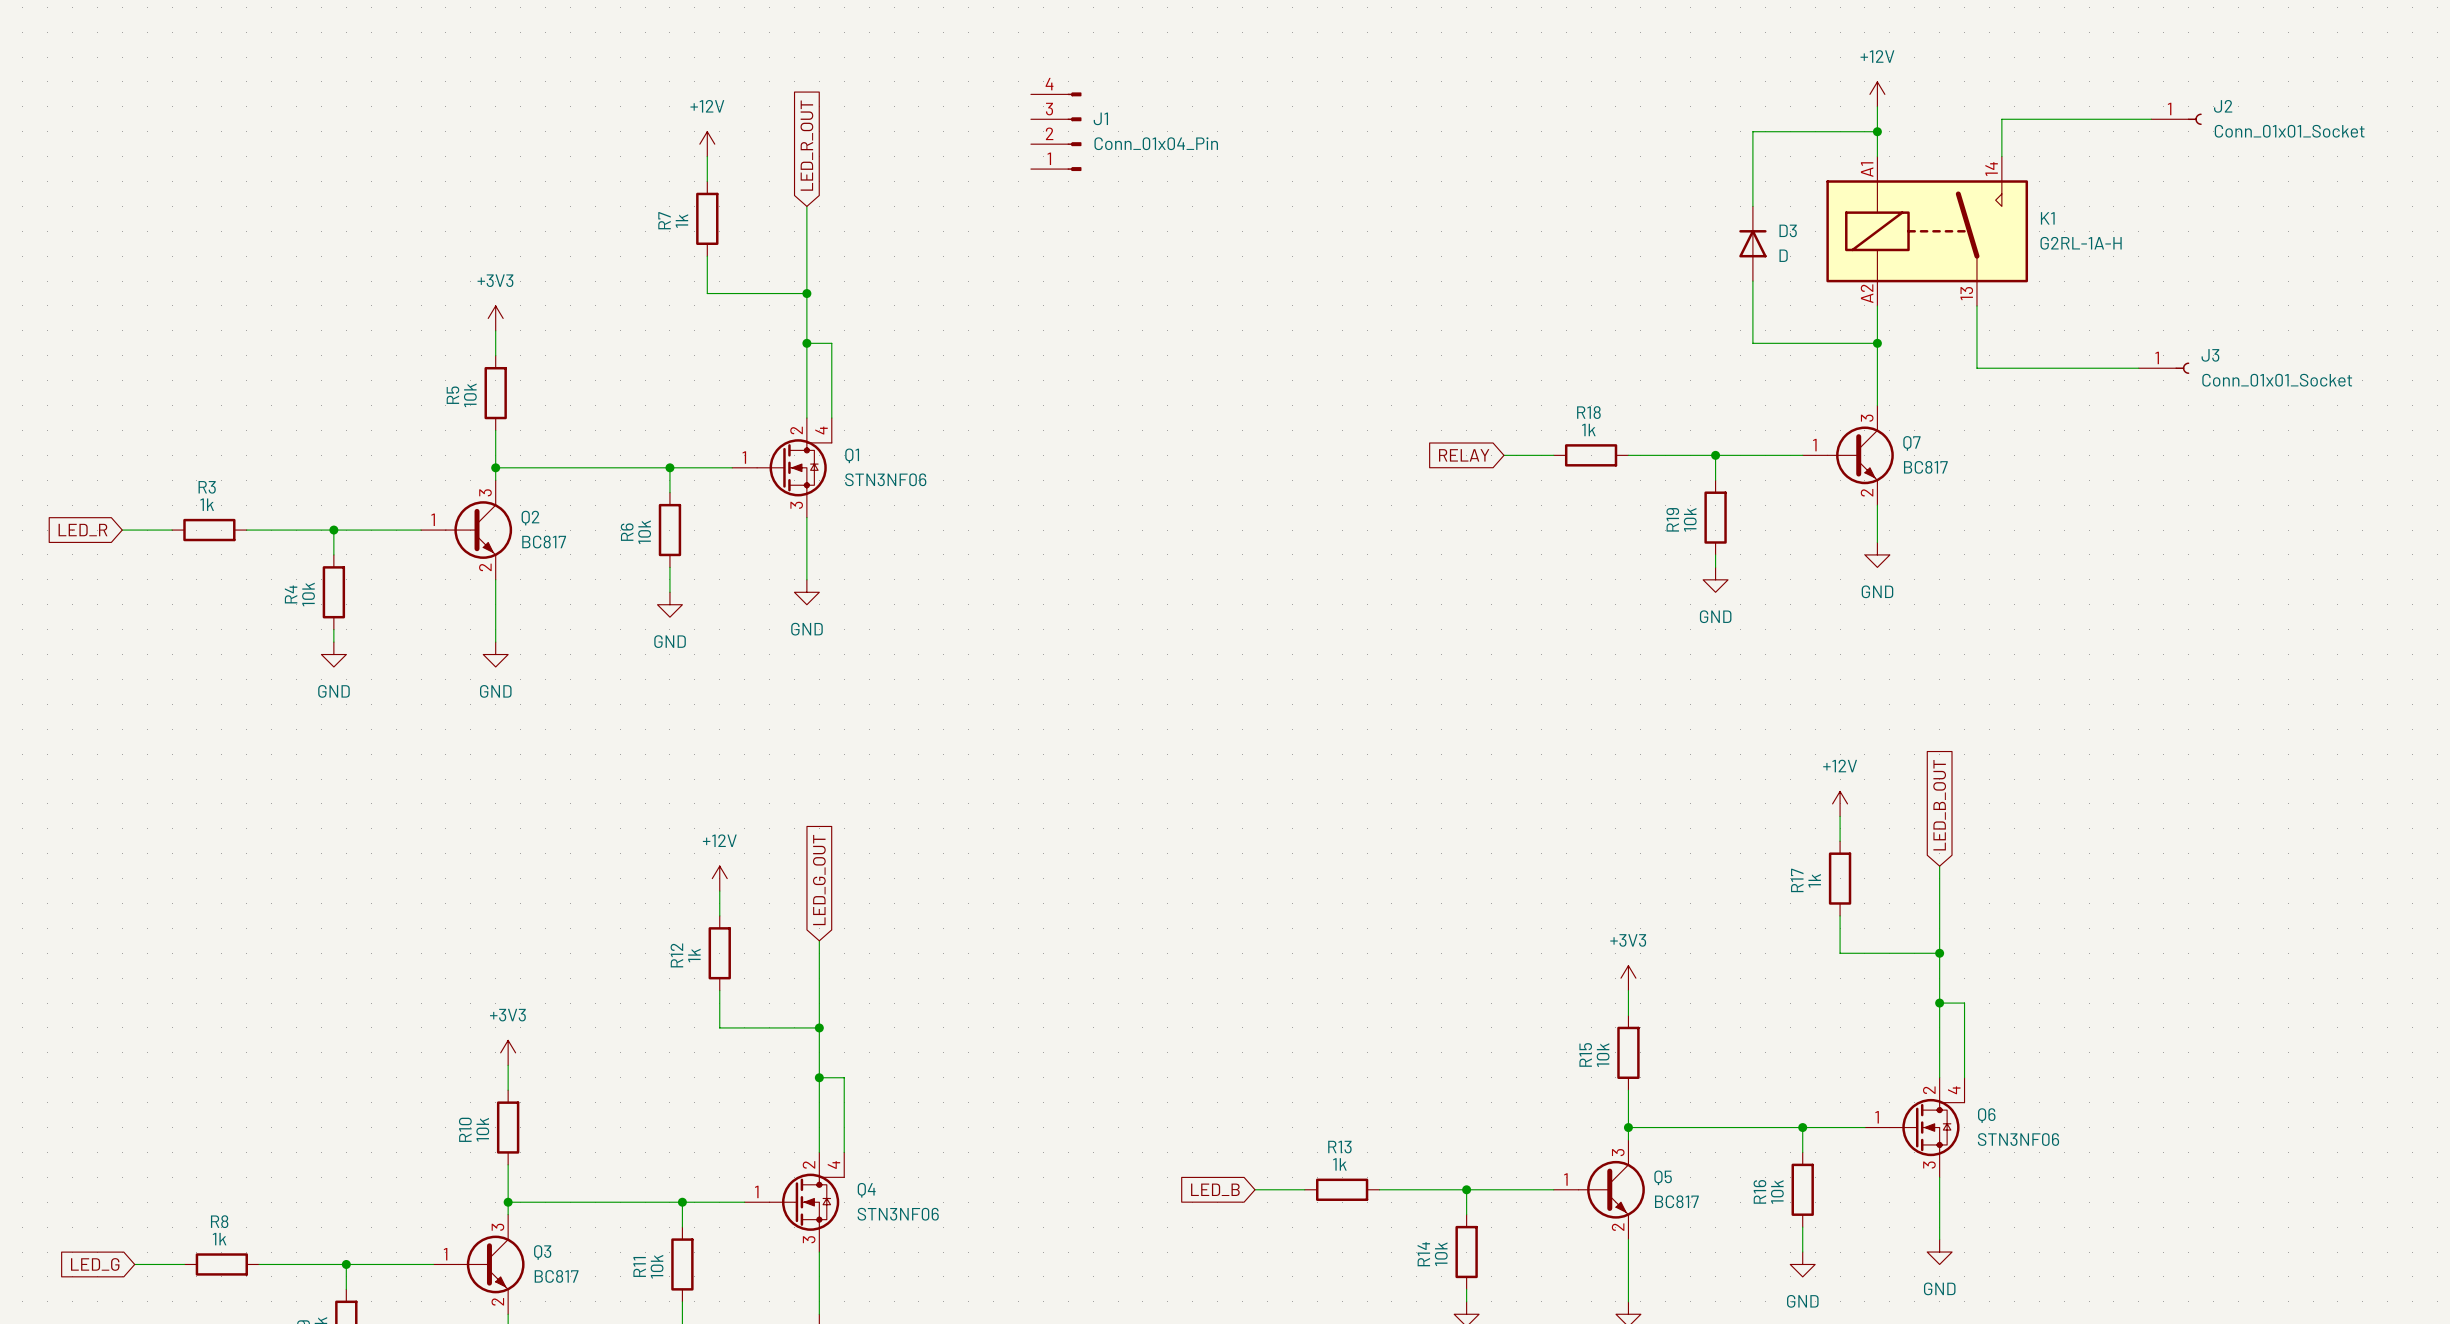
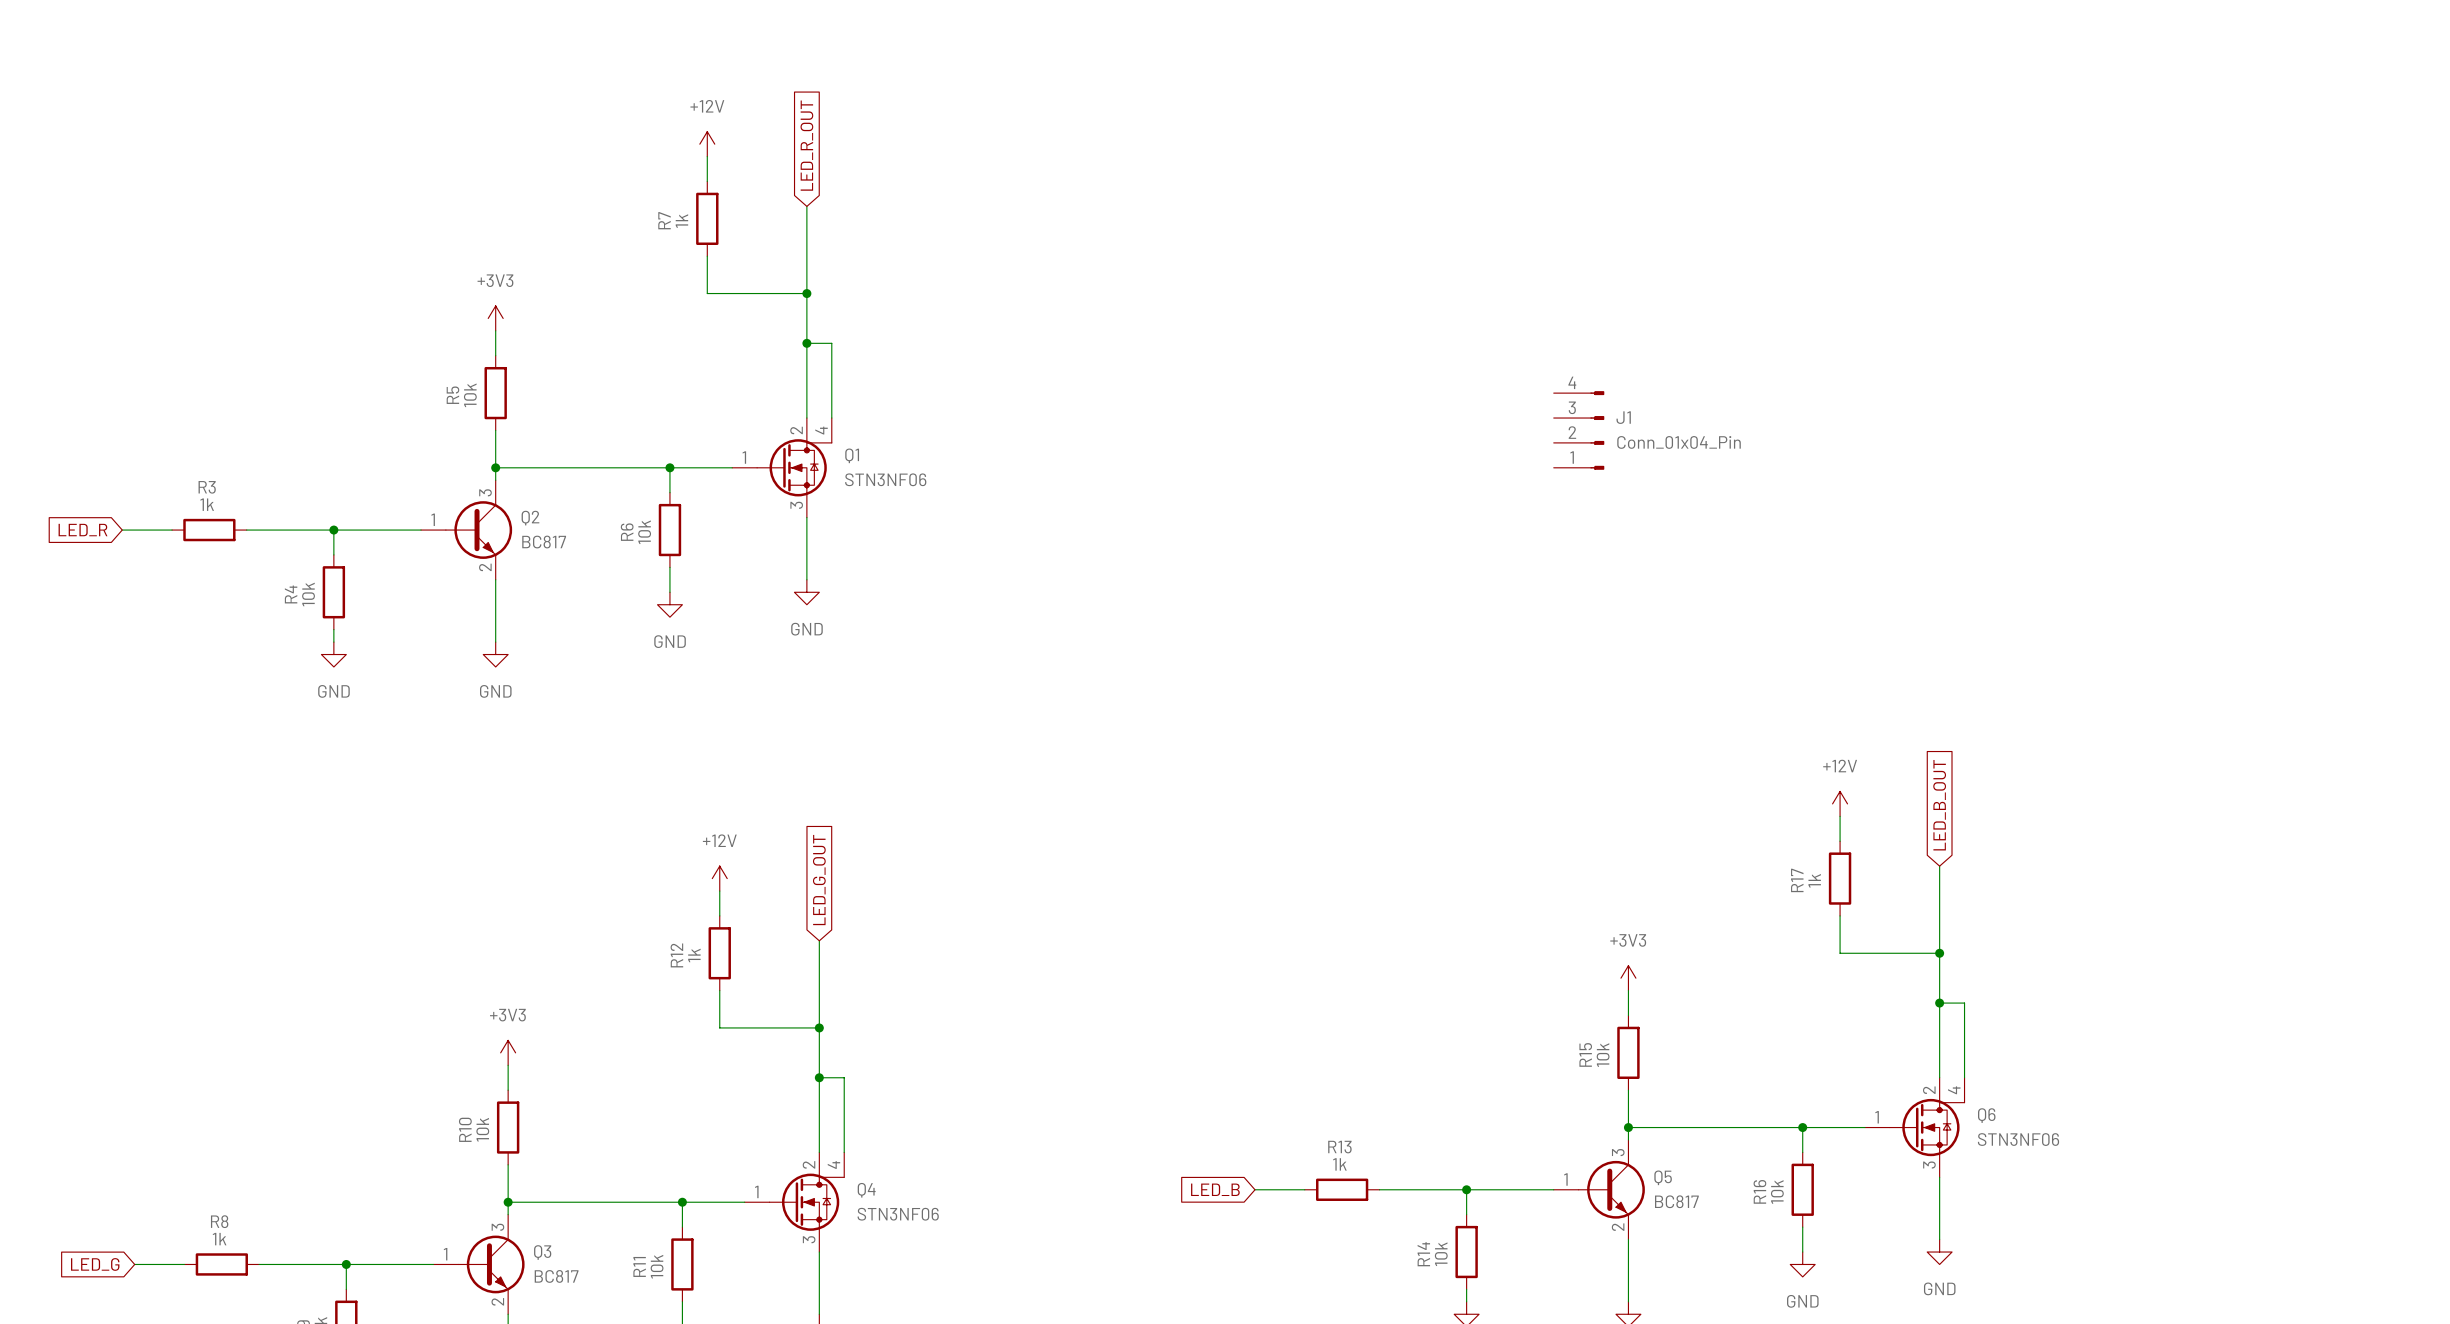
power symbol: +12V (1877, 94) -> none
wire: (1877, 106) (1877, 156) -> none
wire: (2151, 119) (2001, 119) (2001, 156) -> none
J2: Conn_01x01_Socket (2176, 119) -> none
J1 position: (1056, 131) -> (1579, 430)
wire: (1877, 131) (1752, 131) (1752, 206) -> none
junction: (1877, 131) -> none
K1: G2RL-1A-H (1927, 231) -> none
D3: D (1752, 243) -> none
wire: (1752, 281) (1752, 343) (1877, 343) -> none
wire: (1877, 305) (1877, 405) -> none
wire: (1976, 305) (1976, 368) (2138, 368) -> none
junction: (1877, 343) -> none
J3: Conn_01x01_Socket (2164, 368) -> none
global label: RELAY (1464, 455) -> none
wire: (1503, 455) (1553, 455) -> none
R18: 1k (1591, 455) -> none
wire: (1628, 455) (1802, 455) -> none
wire: (1715, 455) (1715, 480) -> none
junction: (1715, 455) -> none
Q7: BC817 (1848, 455) -> none
wire: (1877, 505) (1877, 542) -> none
R19: 10k (1715, 517) -> none
wire: (1715, 554) (1715, 567) -> none
power symbol: GND (1877, 554) -> none
power symbol: GND (1715, 579) -> none

